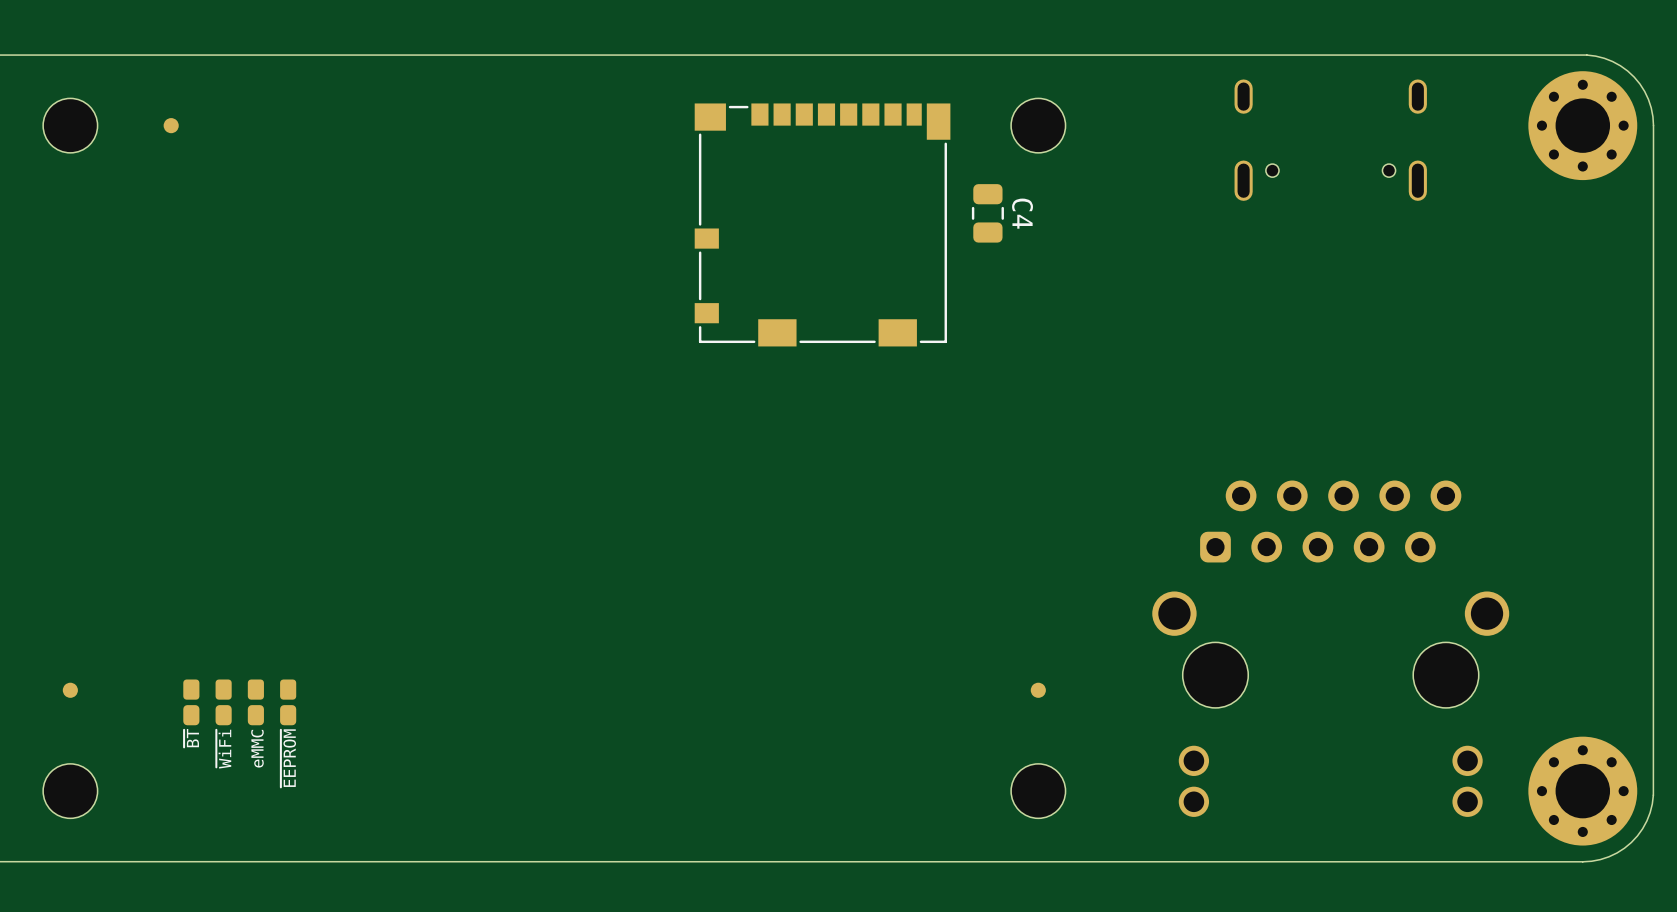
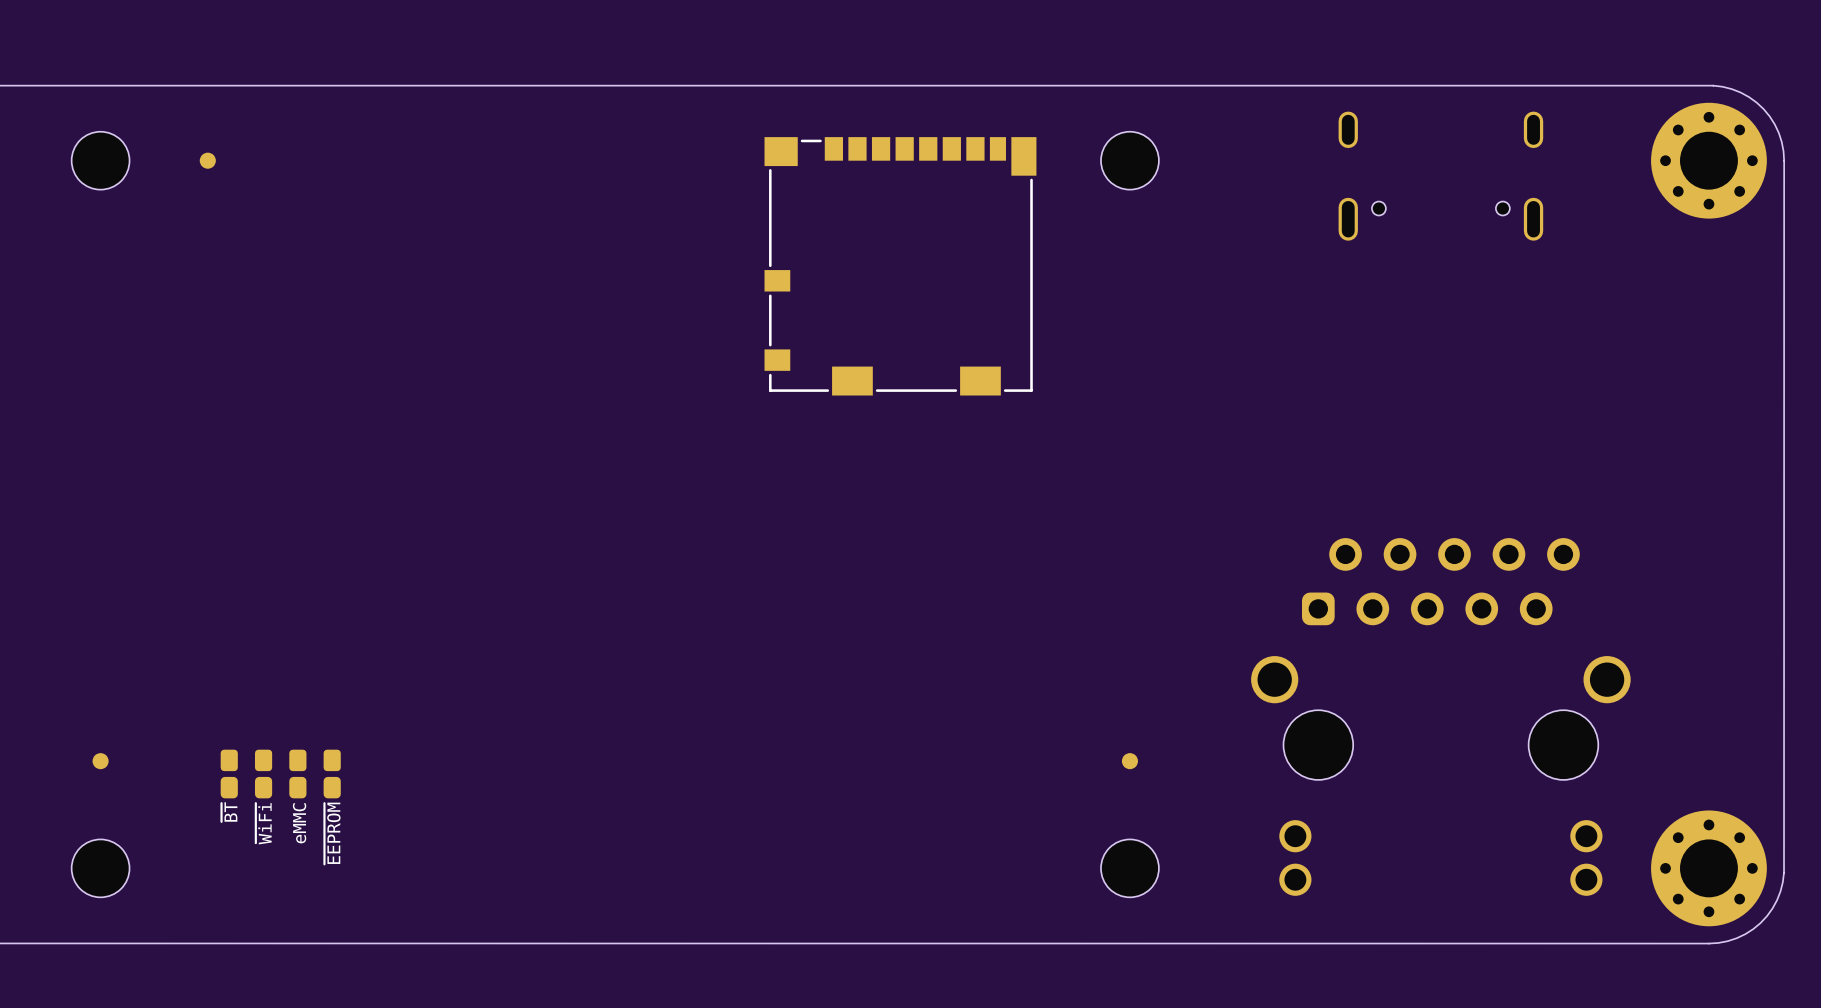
C4: (987, 213) -> none

